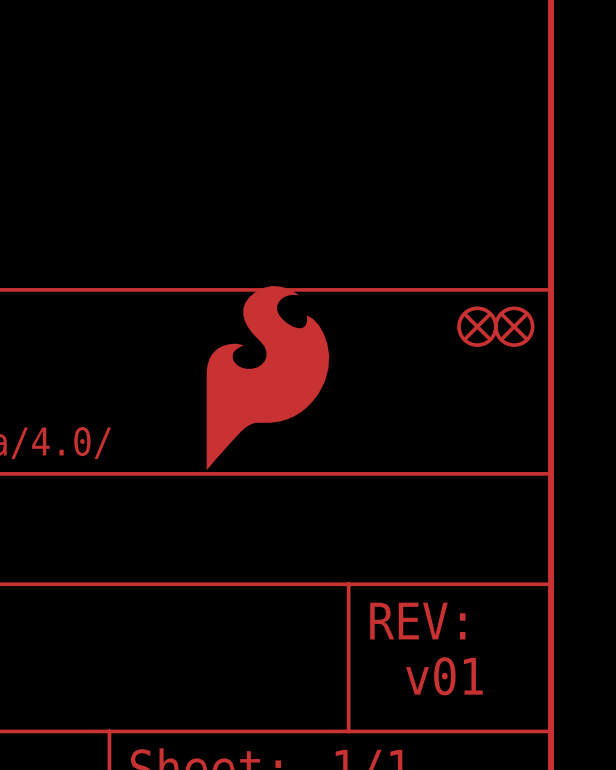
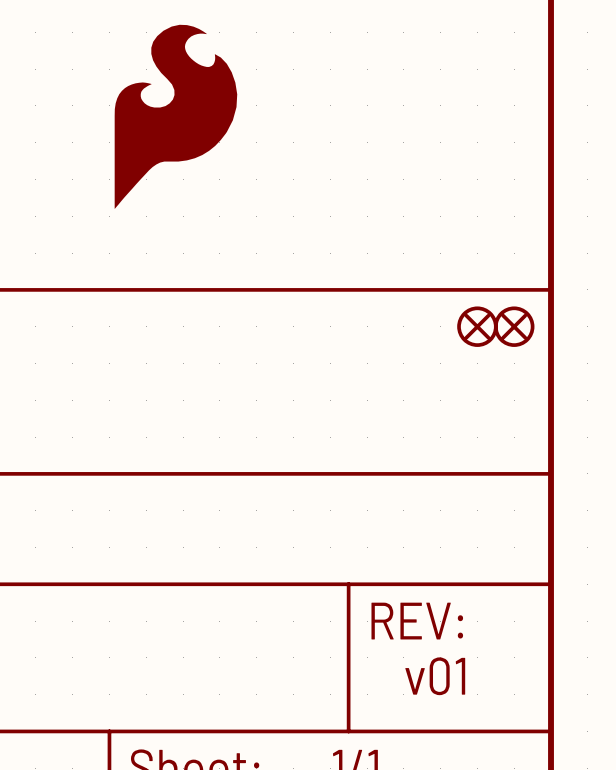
part position: (267, 378) -> (175, 116)

